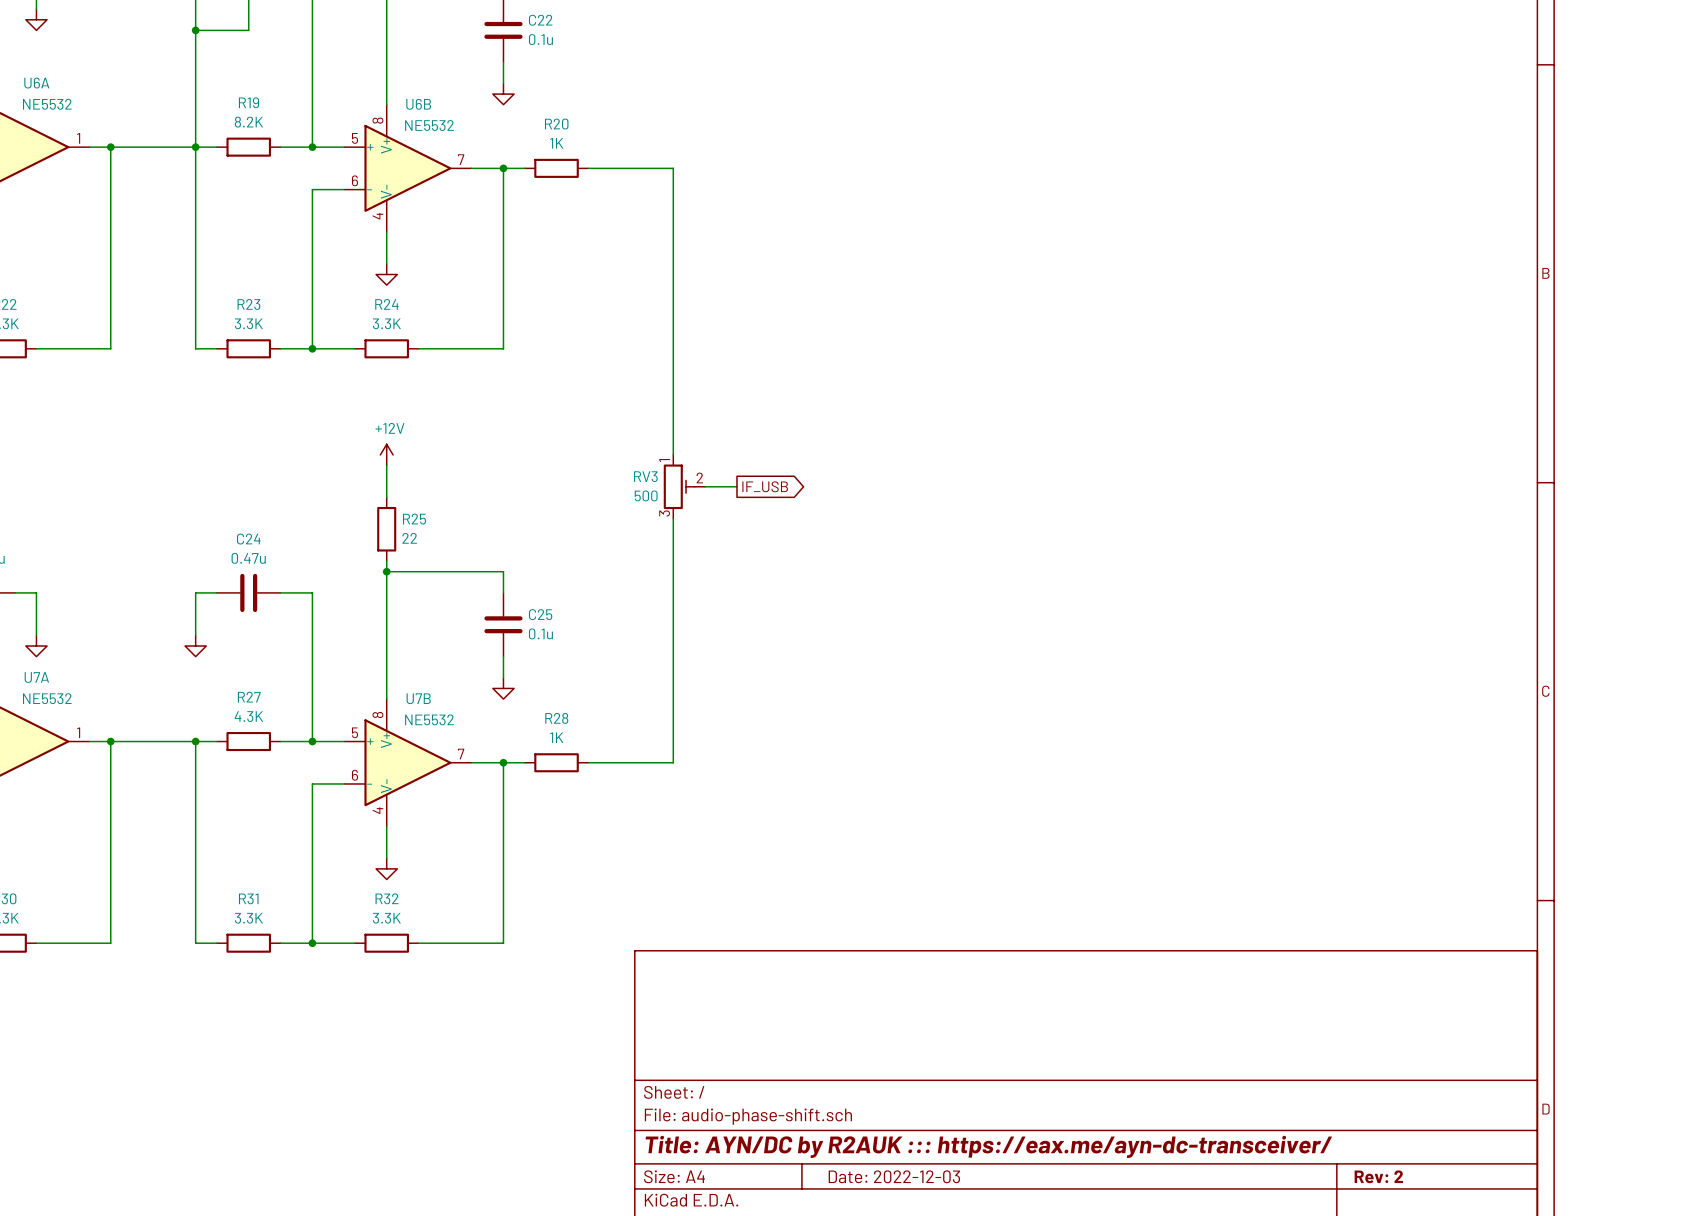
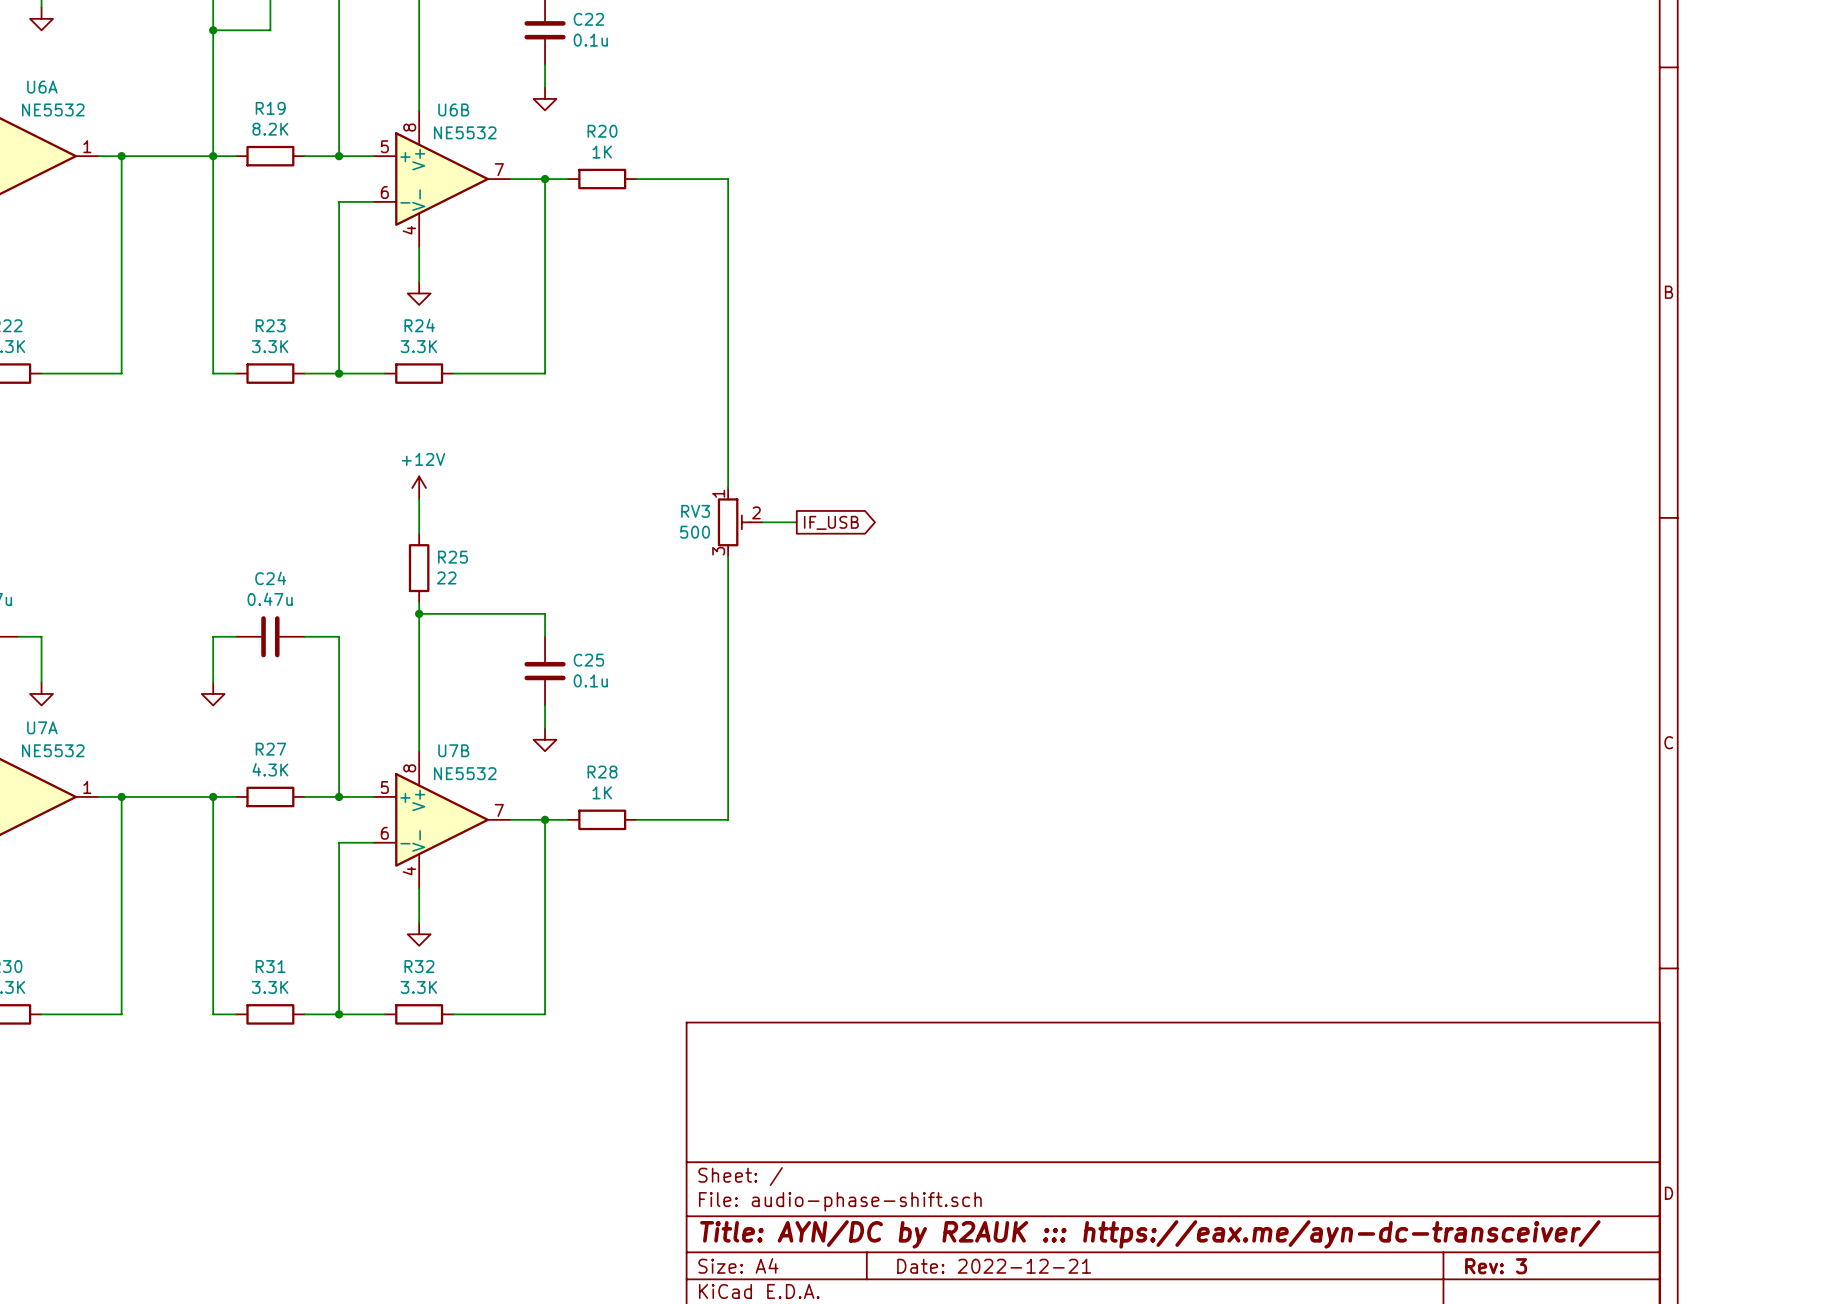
title block: Date: 2022-12-03 (894, 1176) -> Date: 2022-12-21 (994, 1266)
title block: Rev: 2 (1378, 1176) -> Rev: 3 (1496, 1266)

